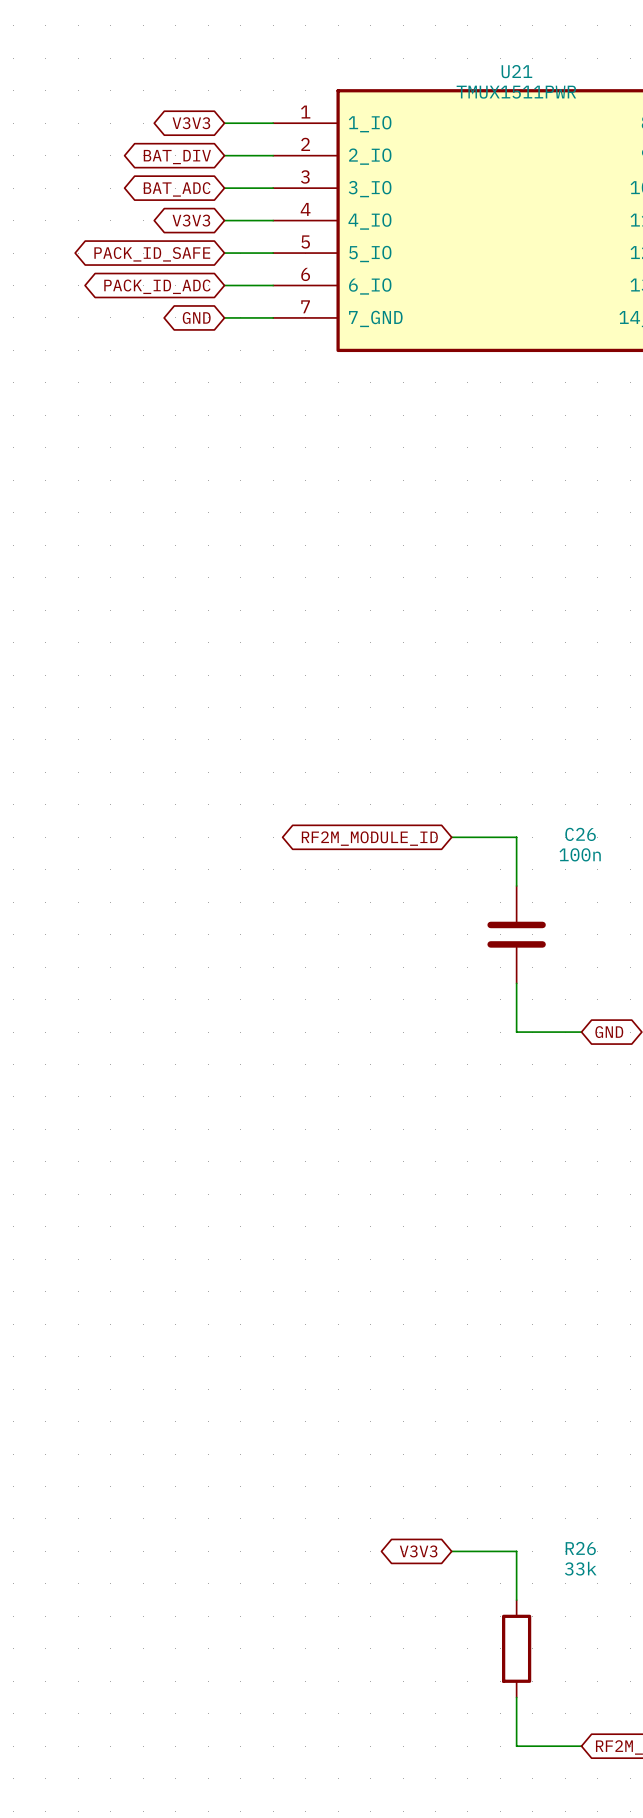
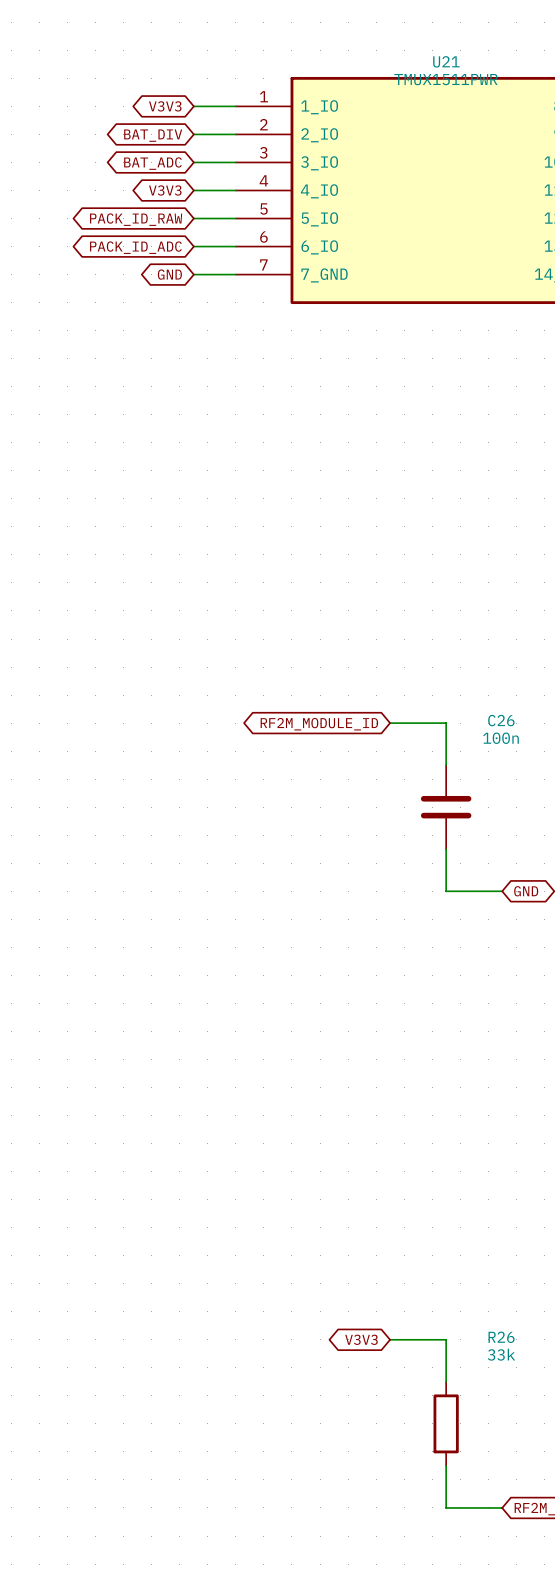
global label: PACK_ID_SAFE (152, 254) -> PACK_ID_RAW (136, 219)

